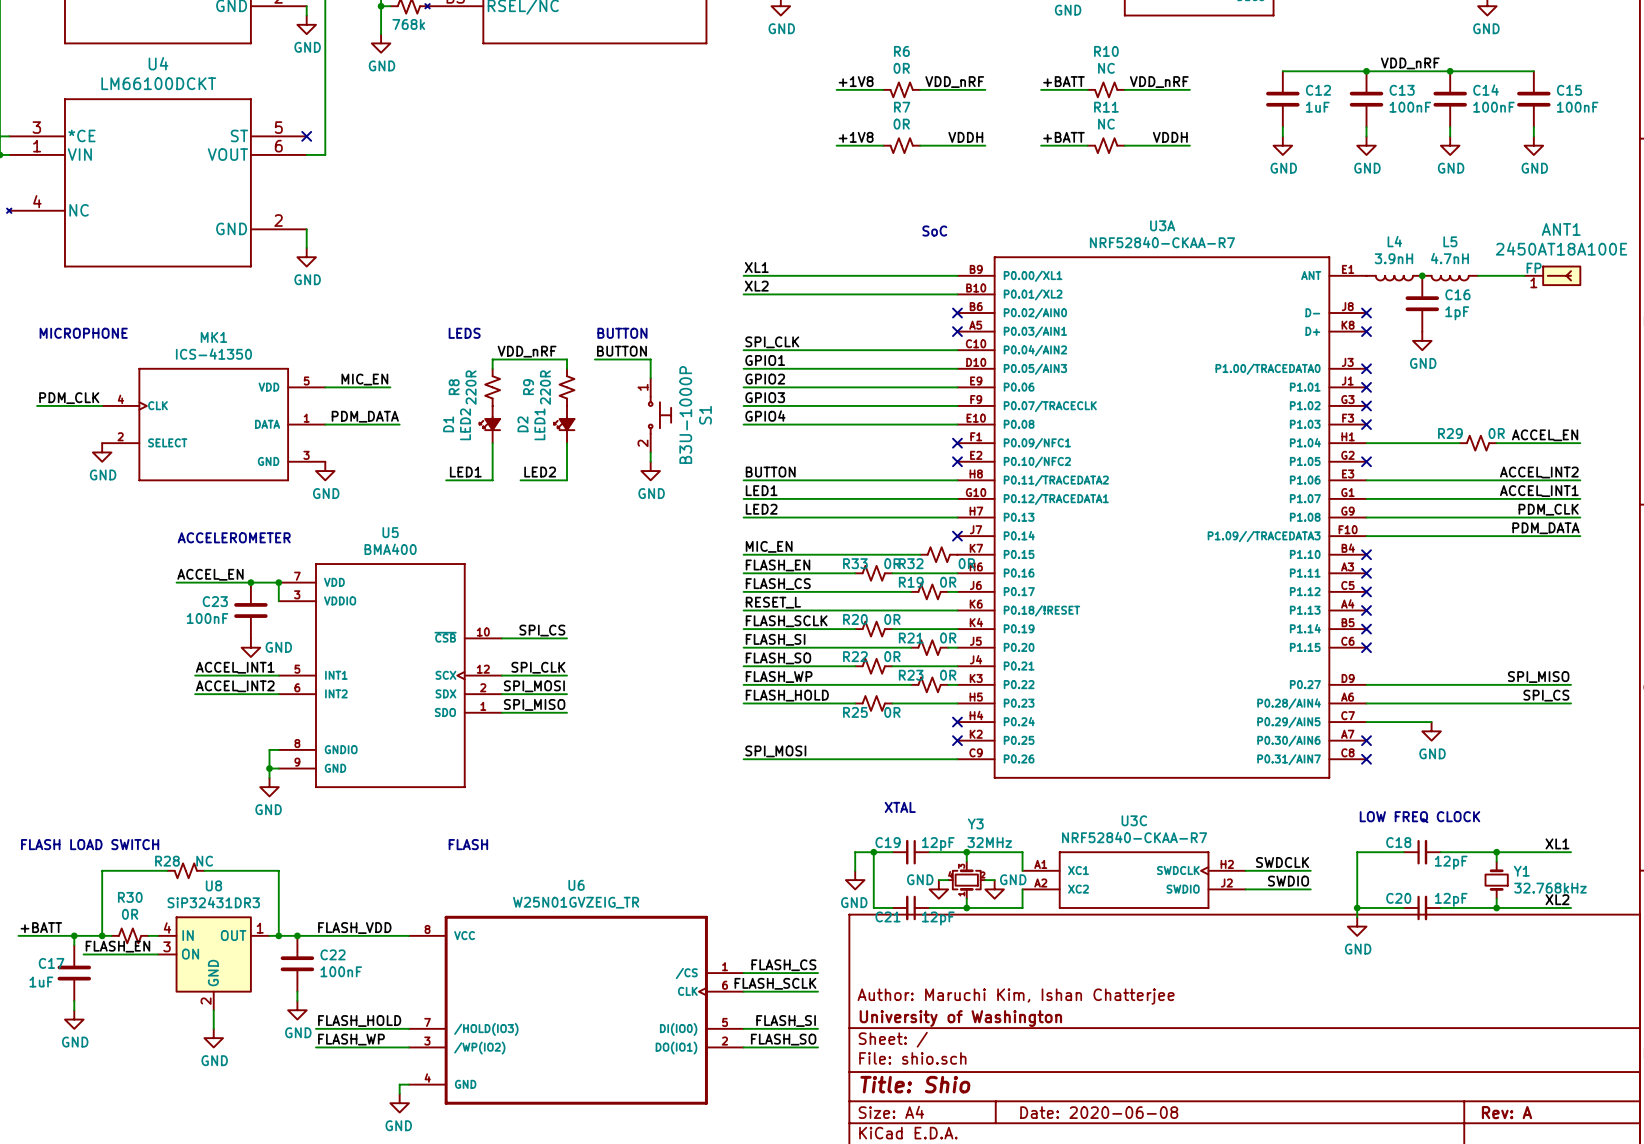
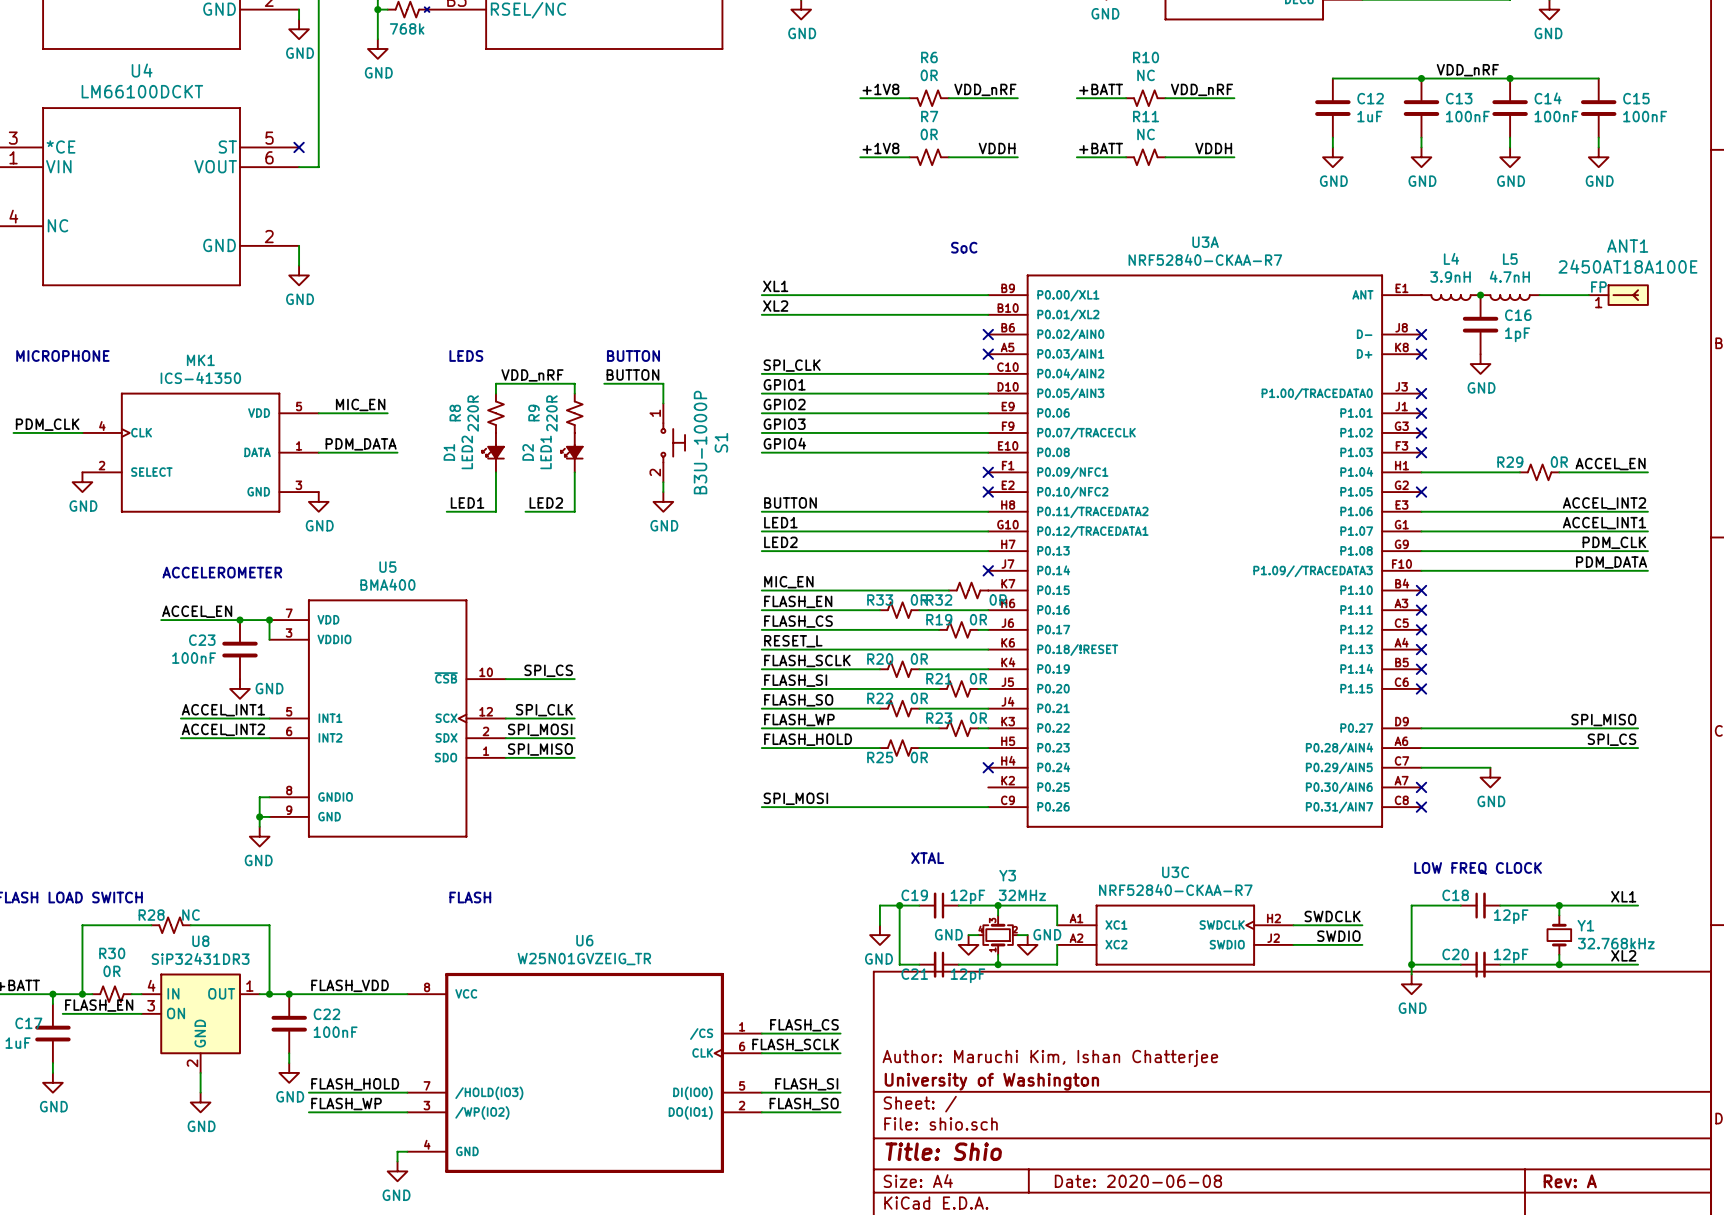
no-connect mark: (957, 740) -> none

